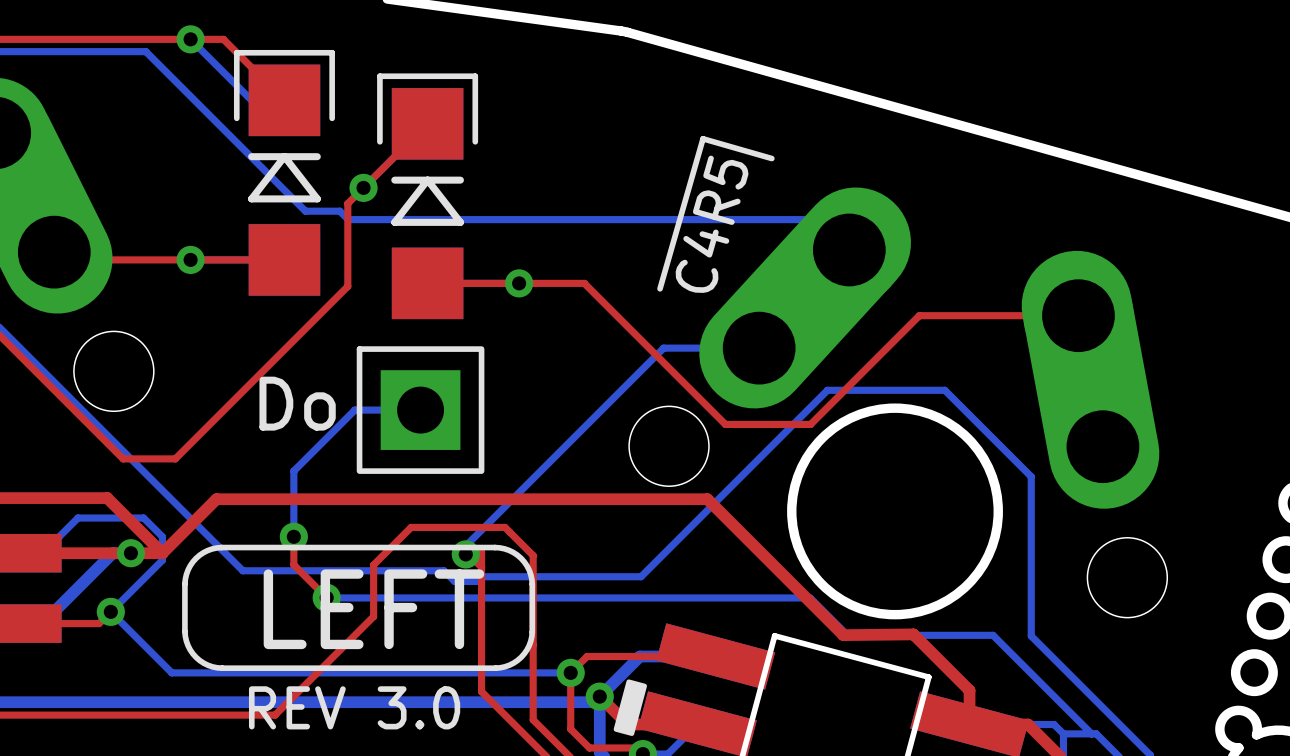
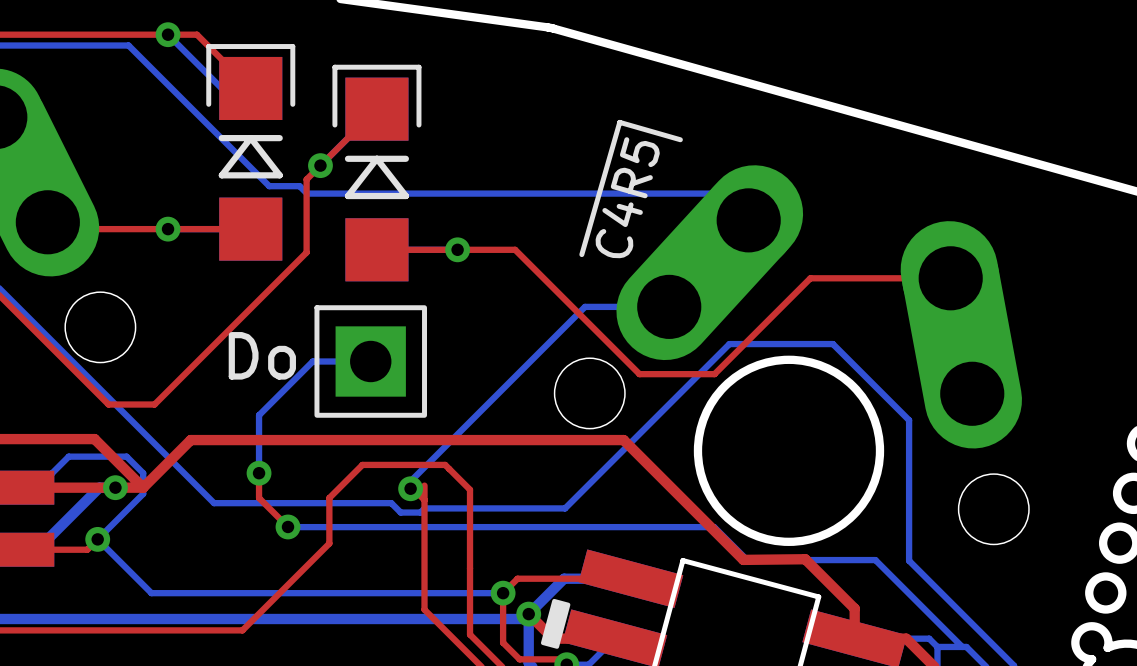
line: (221, 547) (504, 548) (521, 558) (530, 574) (532, 632) (530, 641) (526, 649) (517, 660) (509, 665) (495, 668) (212, 666) (196, 657) (186, 641) (184, 583) (188, 569) (196, 558) (207, 550) (221, 547) -> none
text: LEFT (373, 609) -> none
text: REV 3.0 (354, 707) -> none

